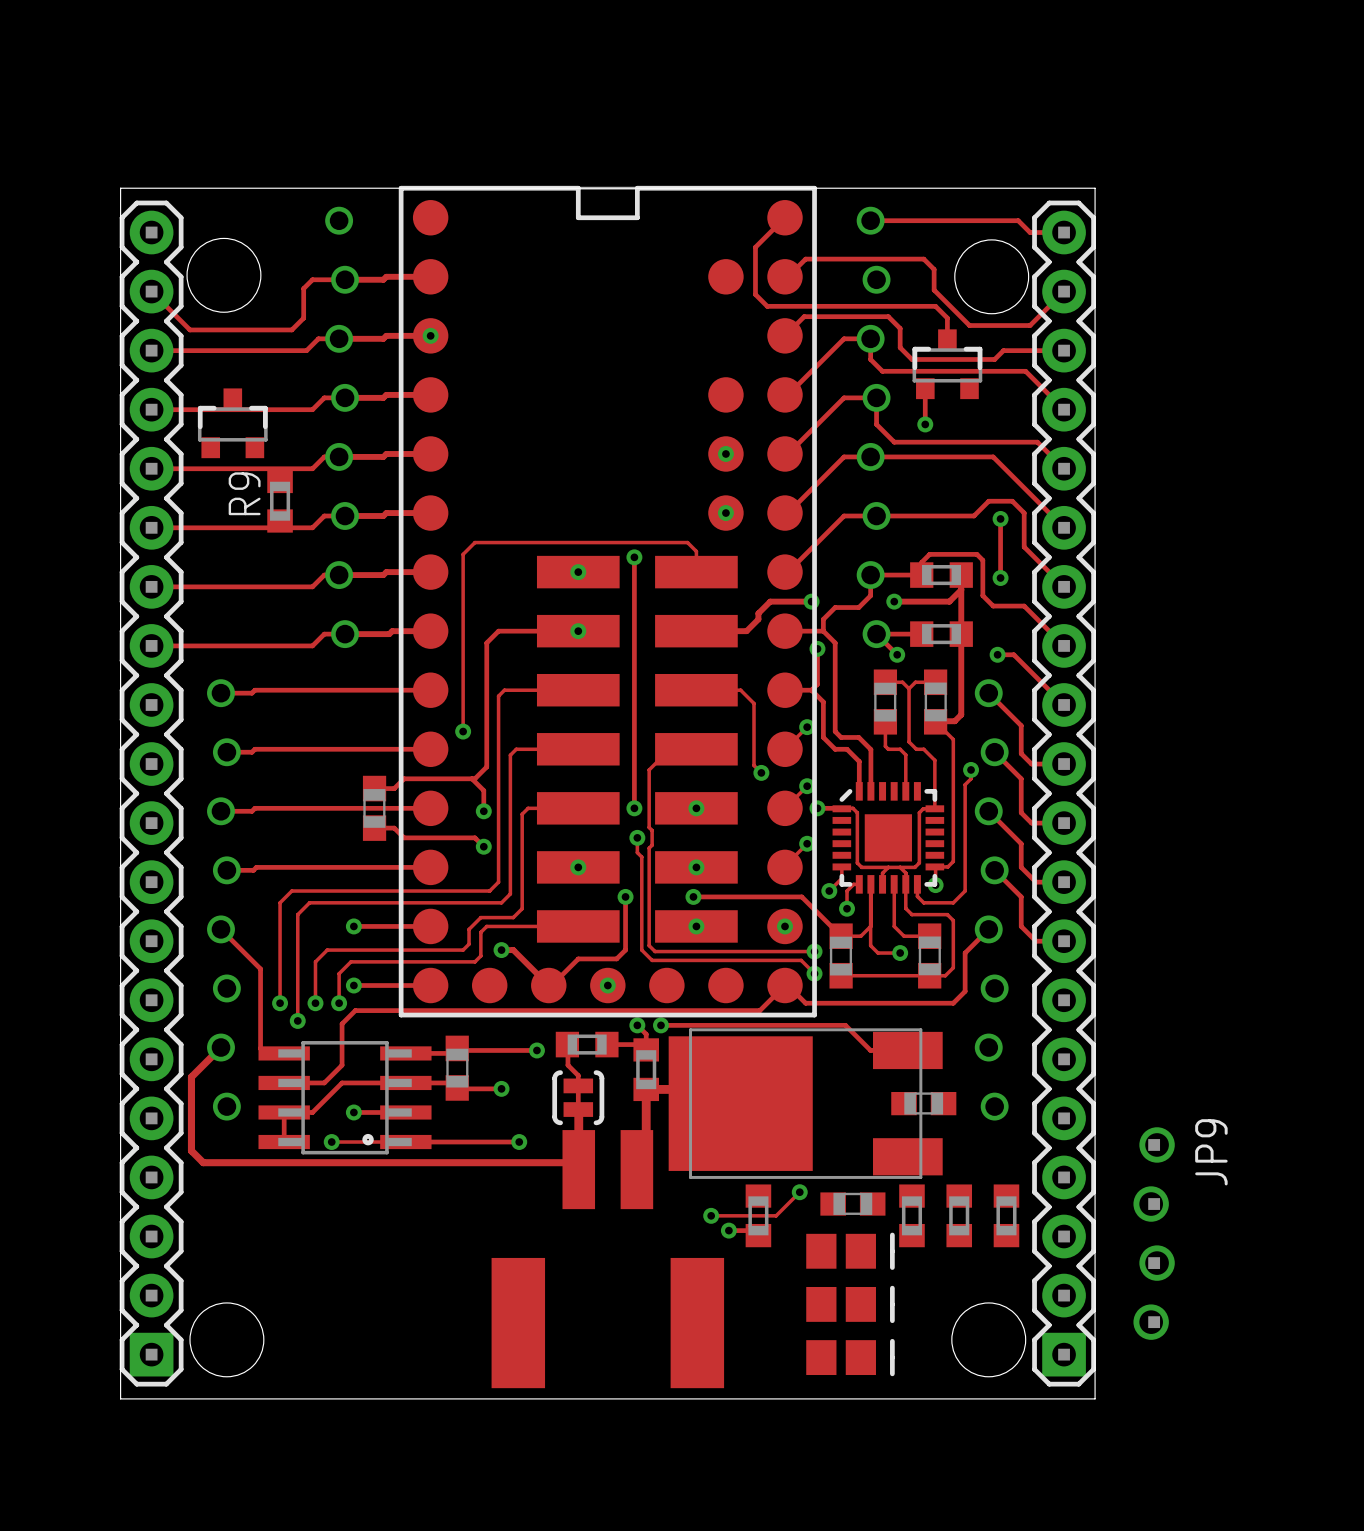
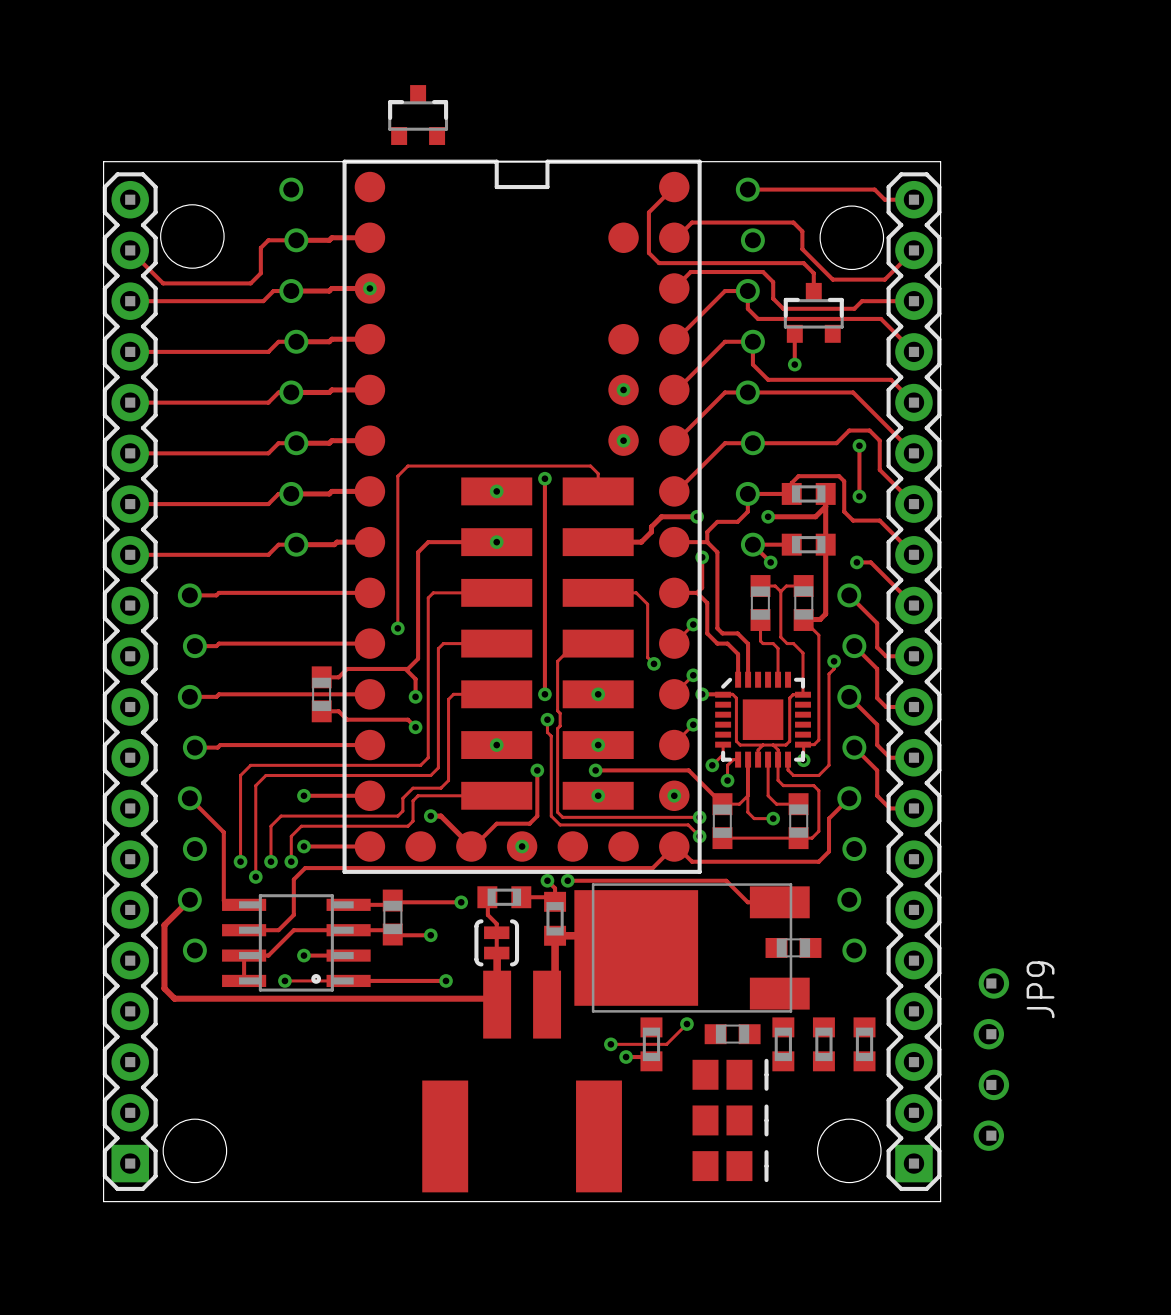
part position: (232, 423) -> (418, 115)
R9: (280, 501) -> none

